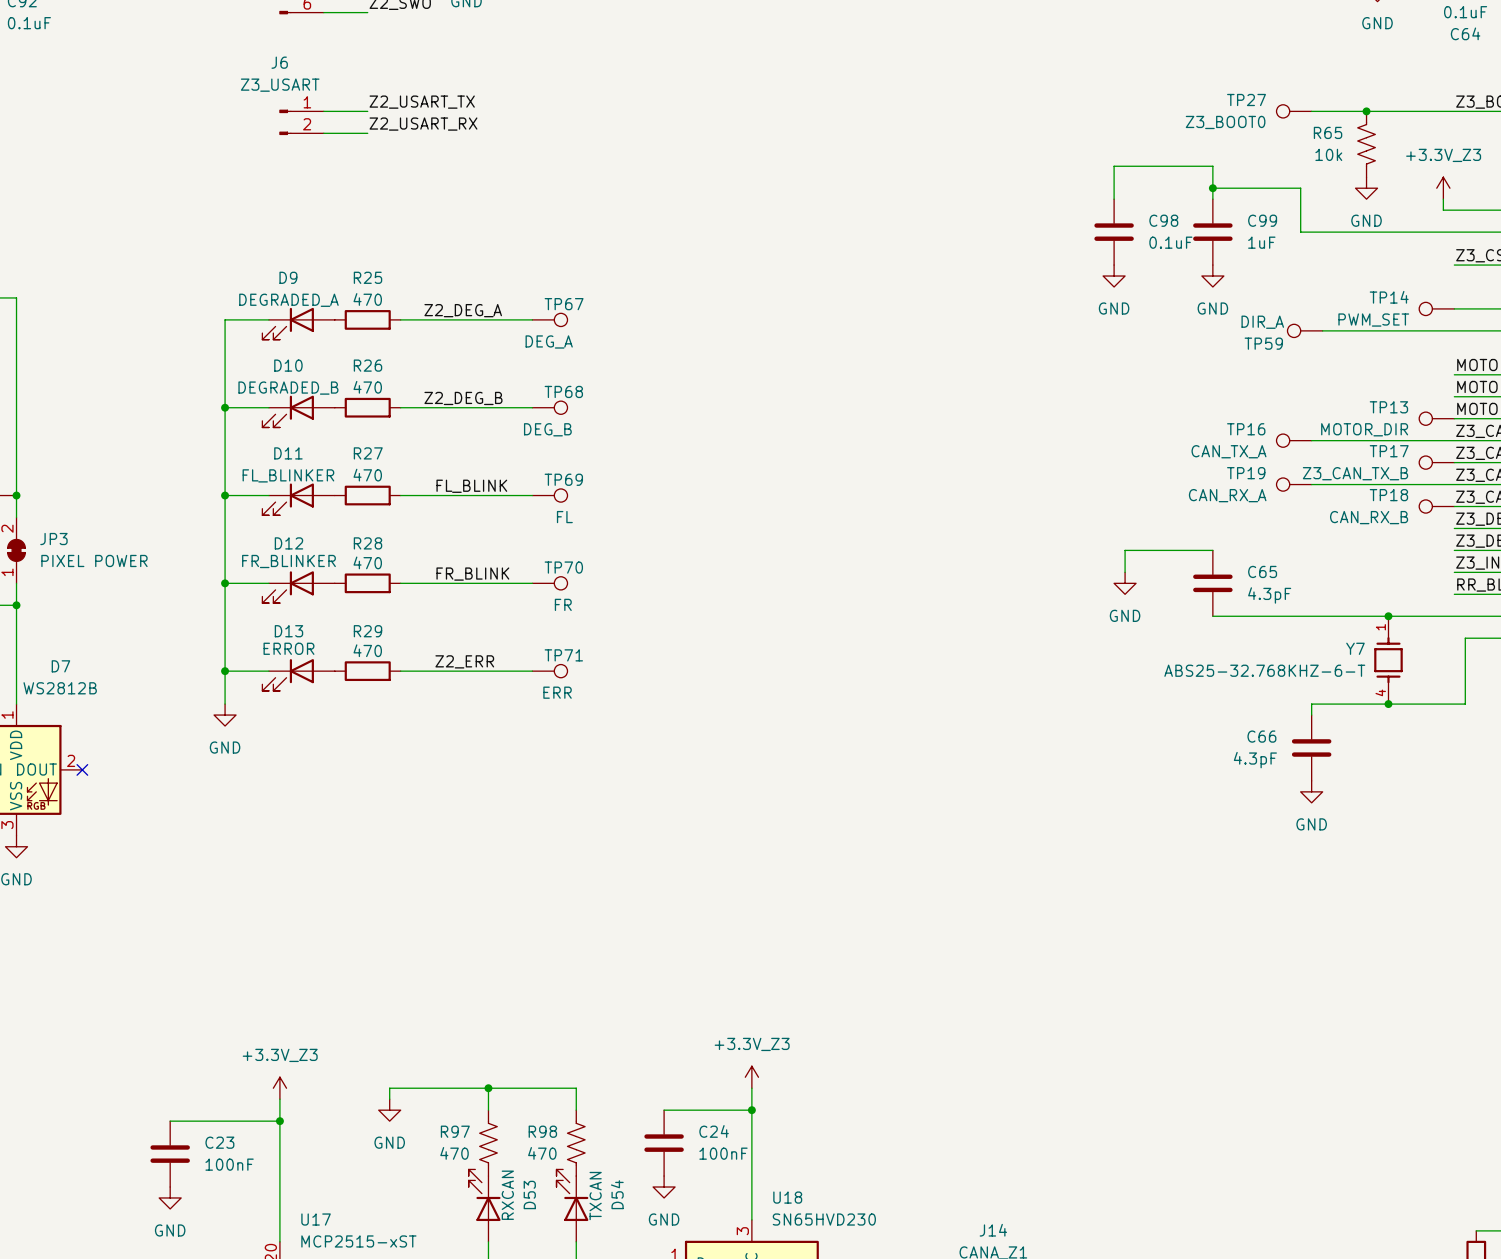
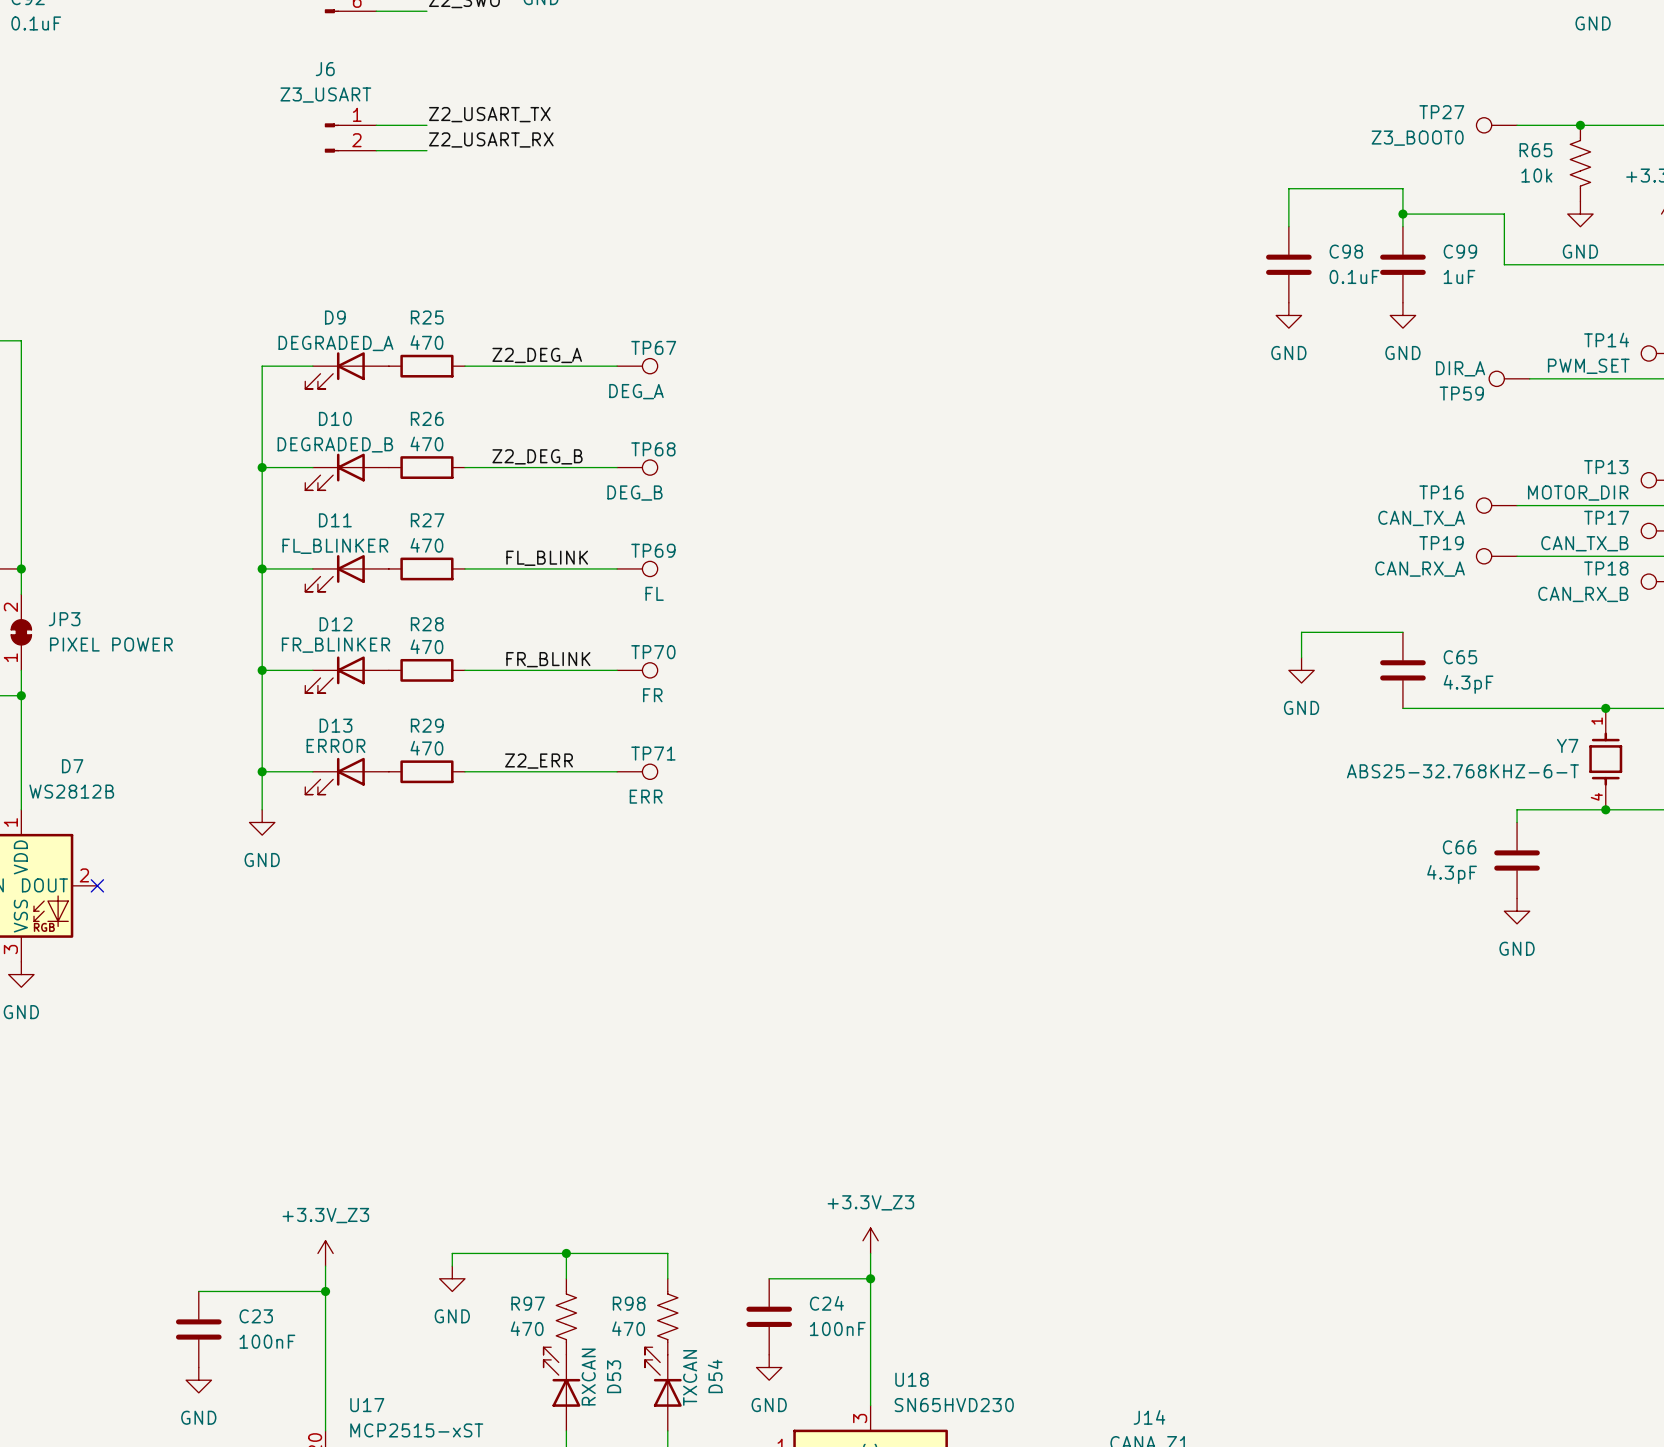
TP17 value: Z3_CAN_TX_B (1355, 473) -> CAN_TX_B (1584, 543)

